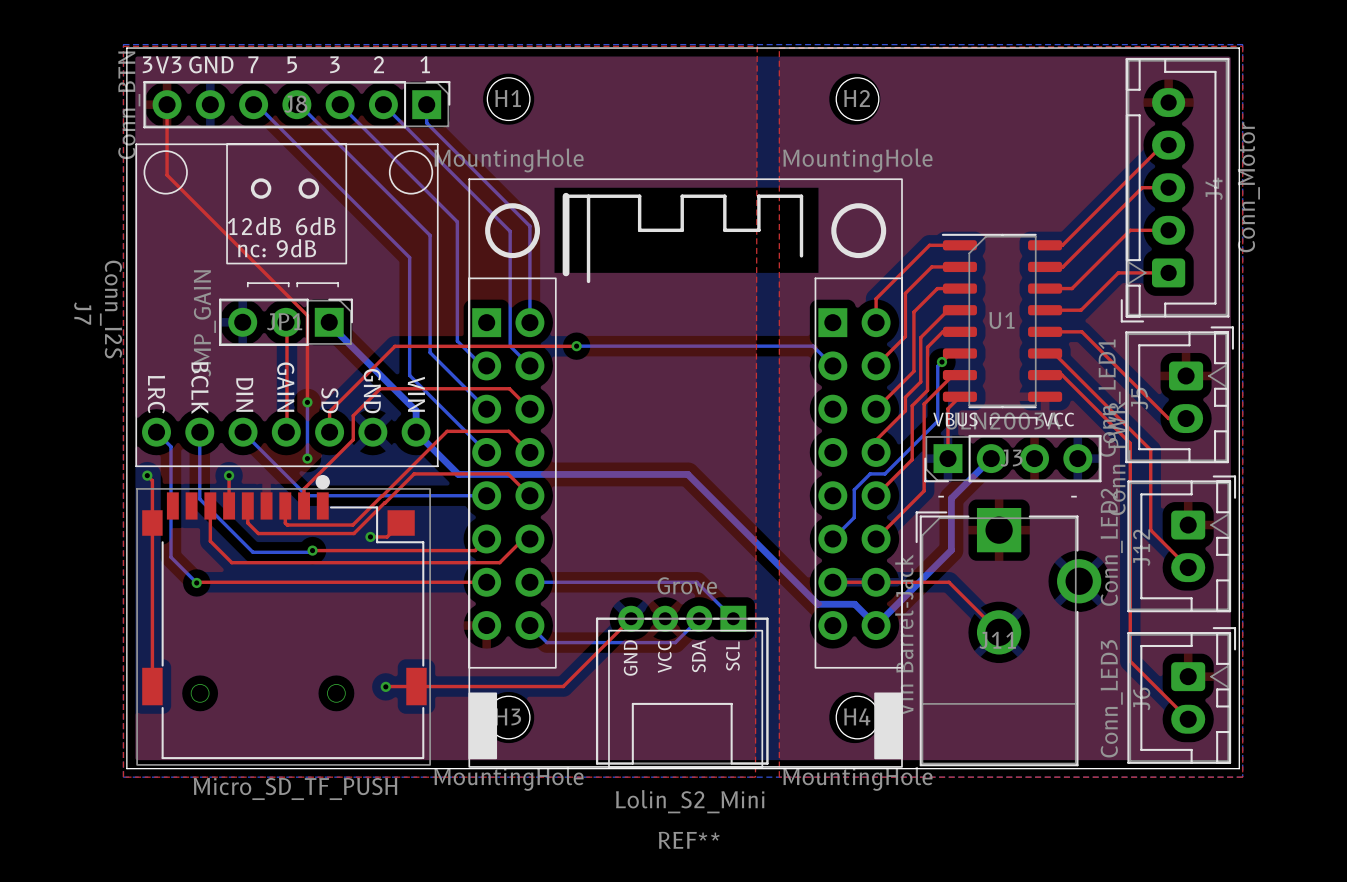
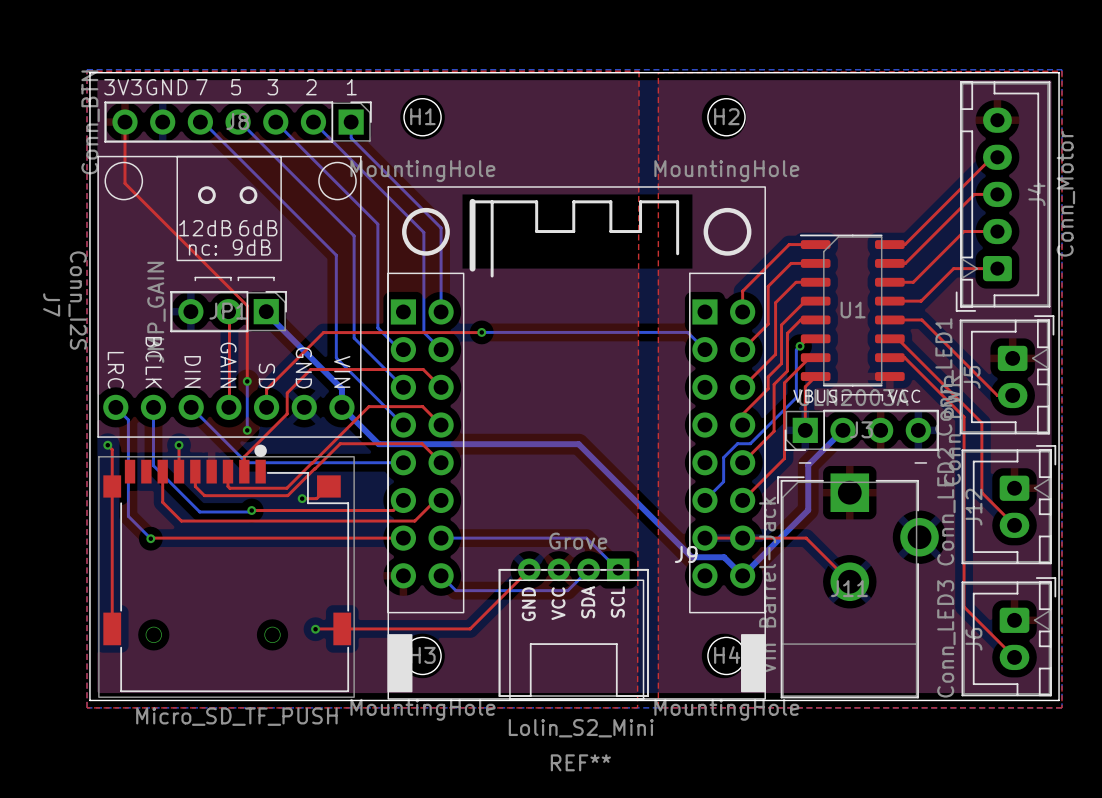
J9 name: none -> J9 (686, 554)

